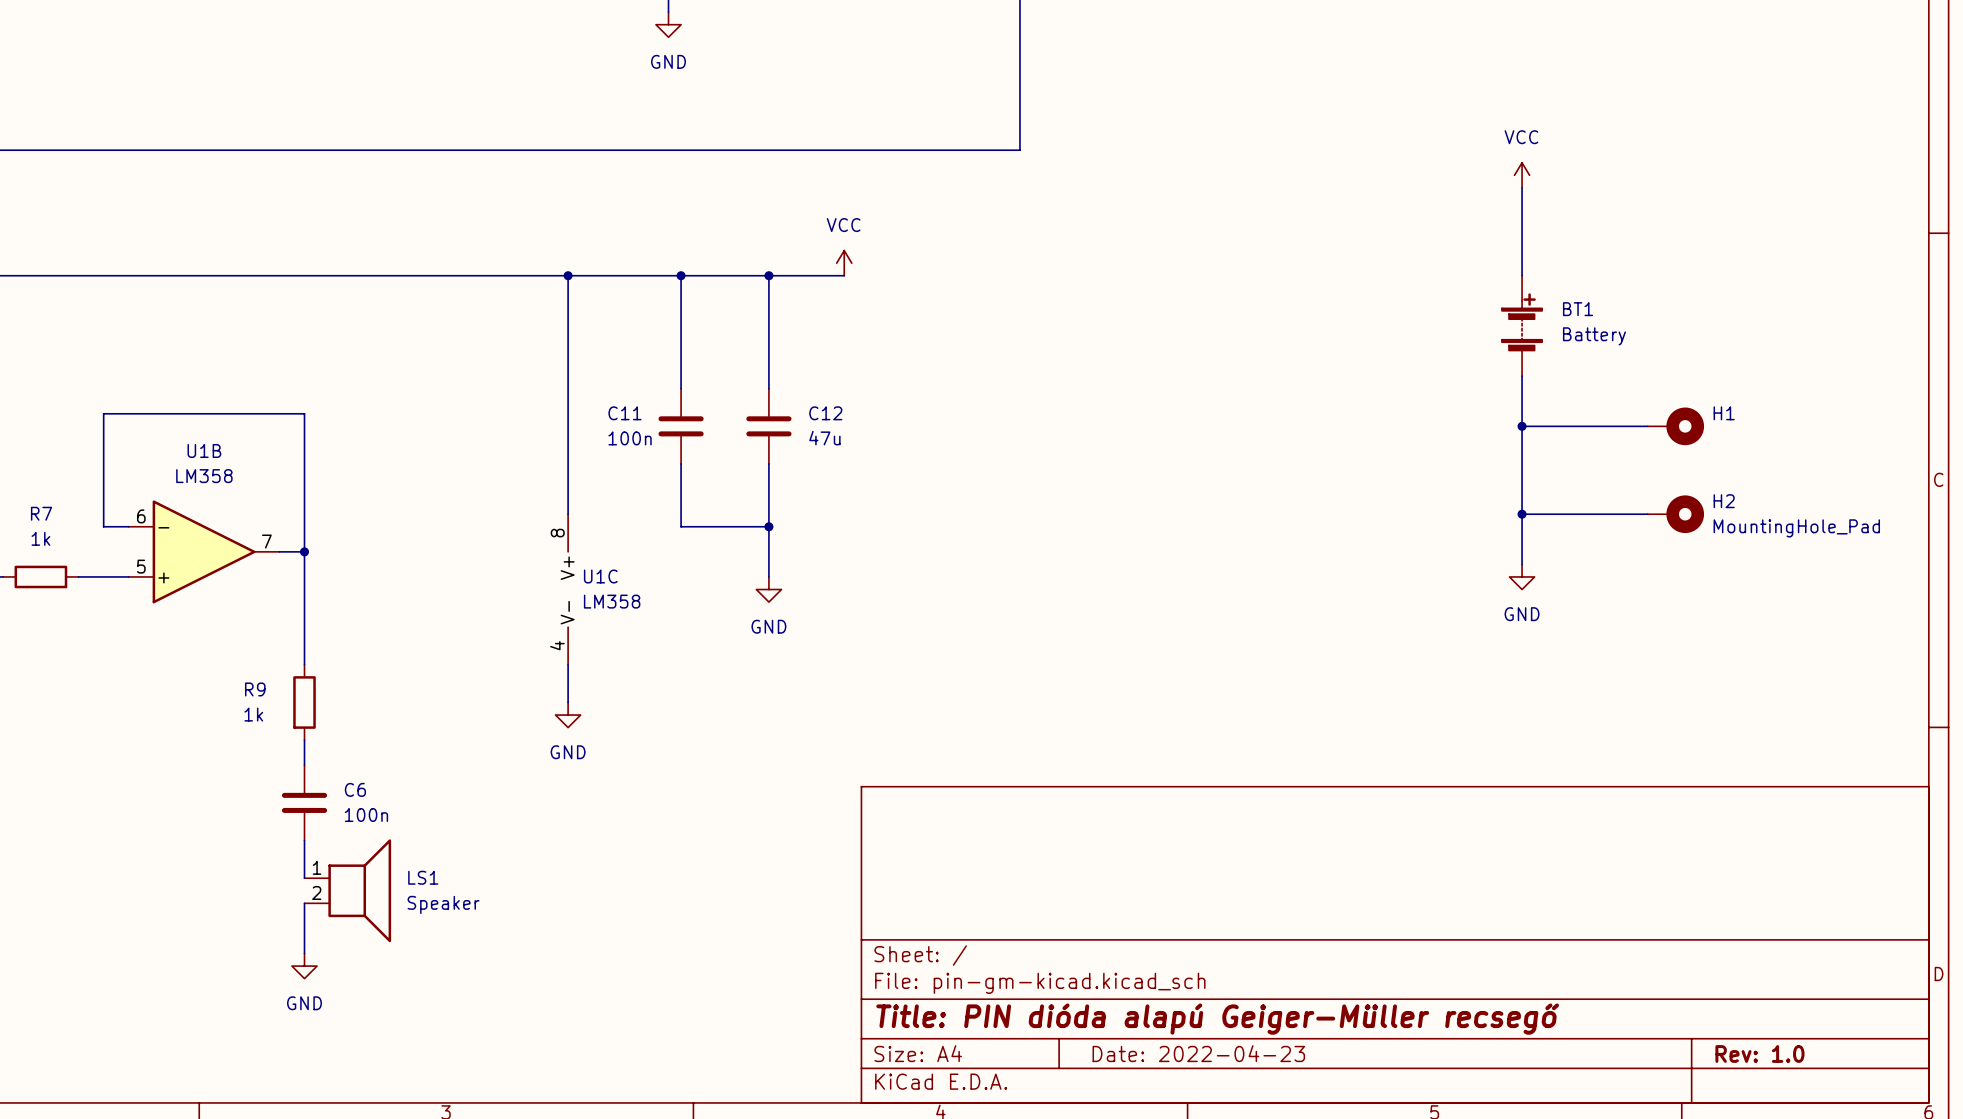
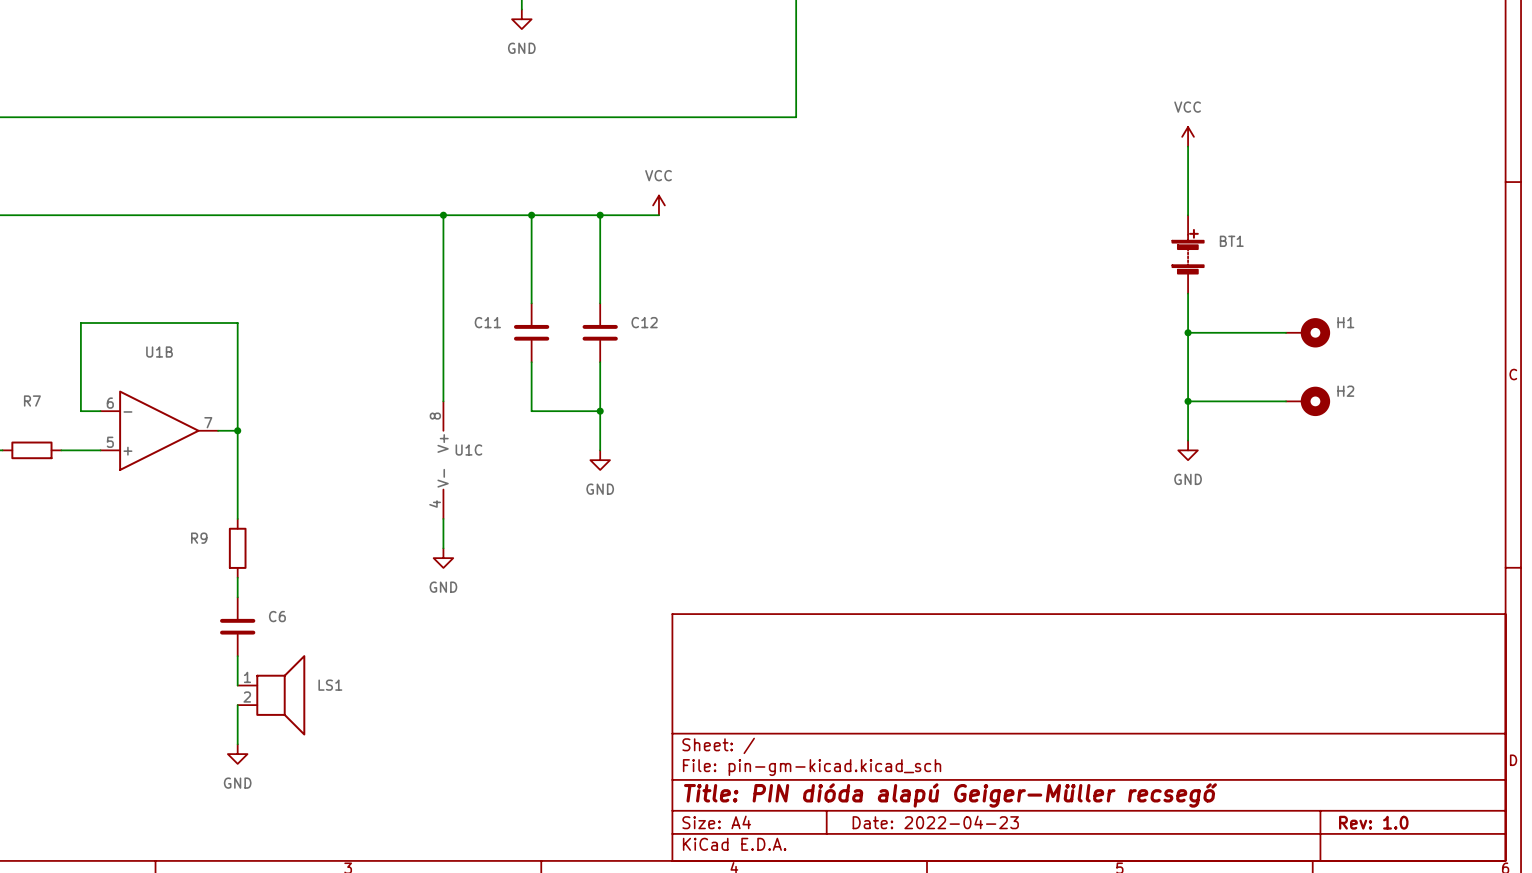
BT1 value: Battery (1594, 336) -> none
C11 value: 100n (630, 438) -> none
C12 value: 47u (824, 438) -> none
U1B value: LM358 (204, 476) -> none
H2 value: MountingHole_Pad (1796, 528) -> none
R7 value: 1k (40, 538) -> none
U1C value: LM358 (612, 601) -> none
R9 value: 1k (253, 714) -> none
C6 value: 100n (366, 814) -> none
LS1 value: Speaker (443, 904) -> none

